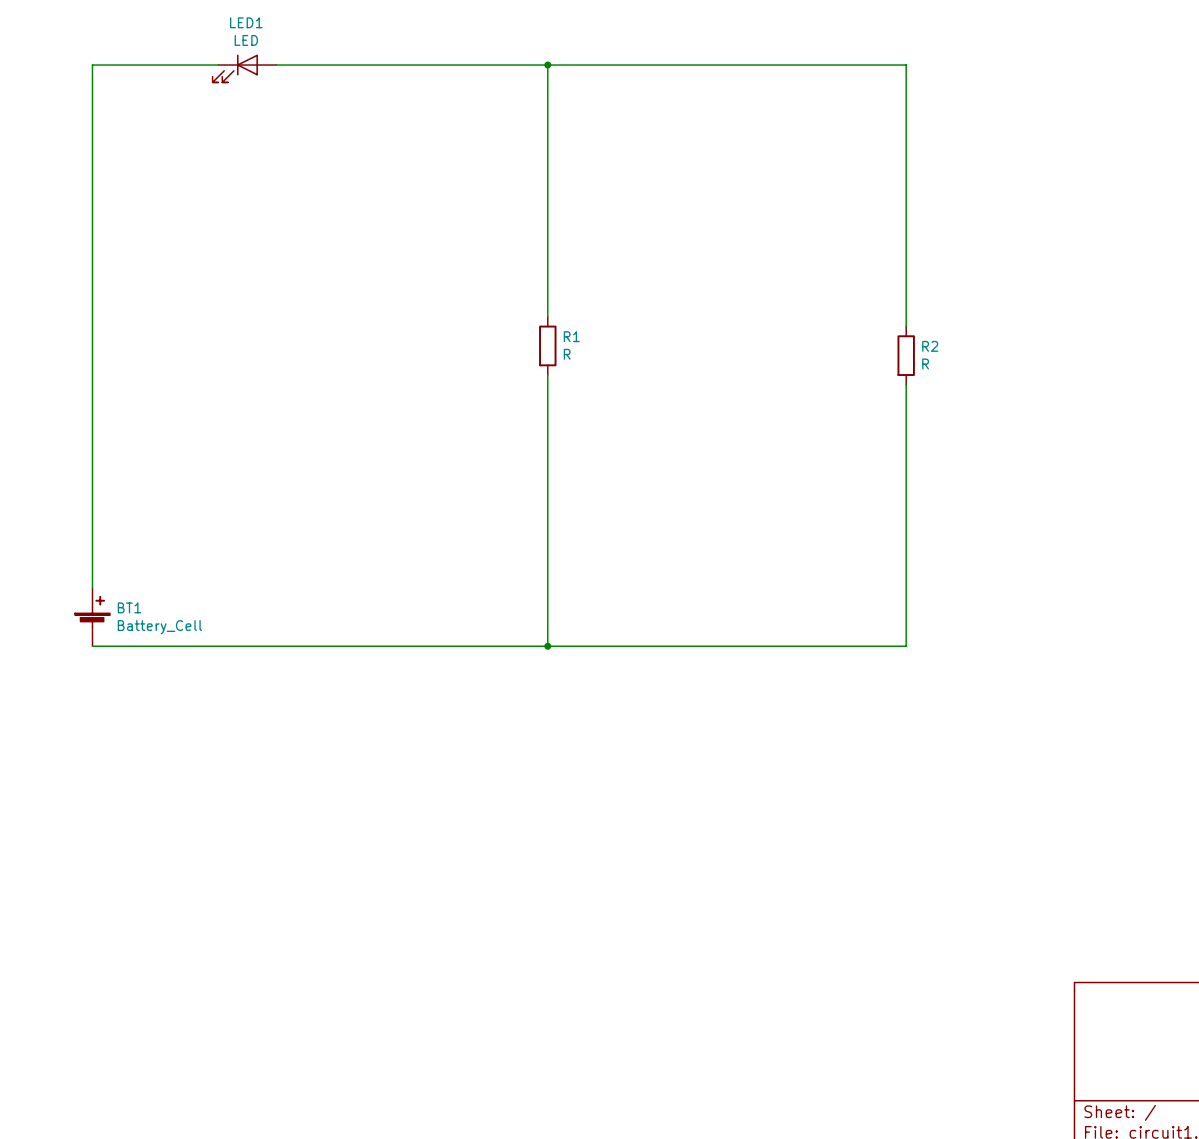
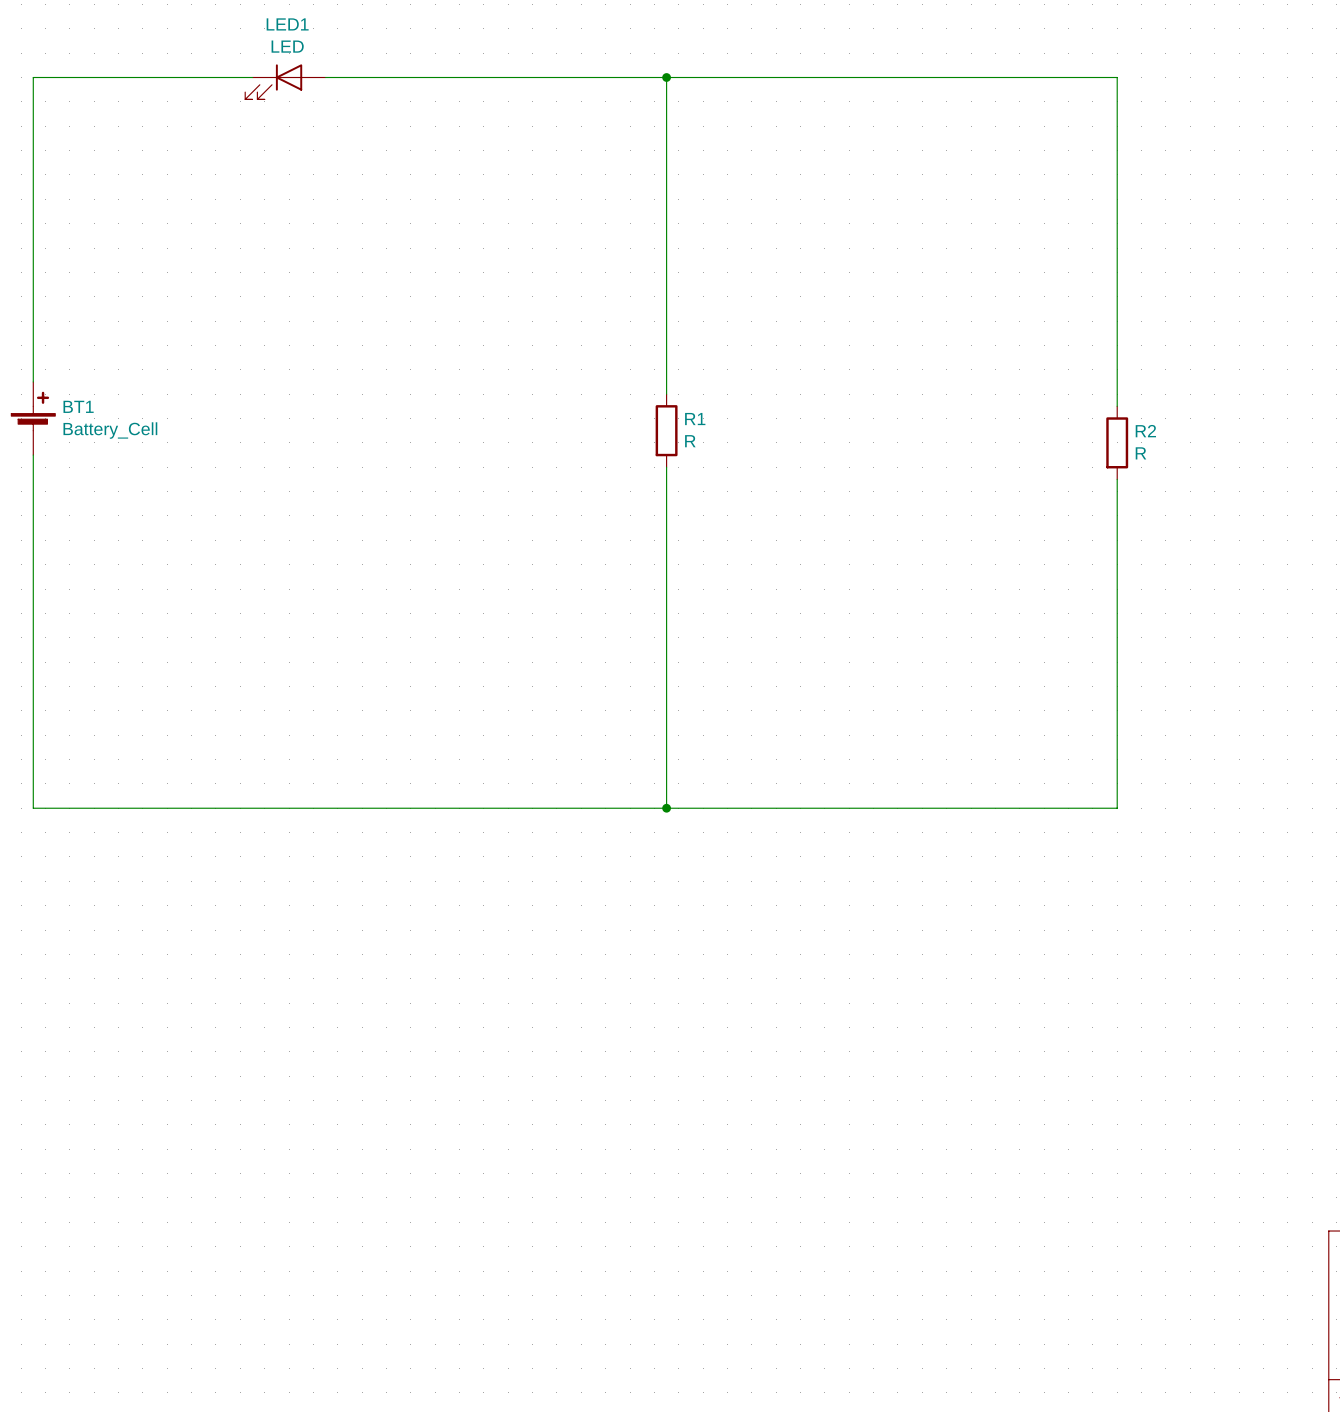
wire: (92, 65) (92, 588) -> (94, 77) (33, 77) (33, 381)
wire: none -> (33, 455) (33, 808) (94, 808)
BT1 position: (92, 617) -> (33, 418)

